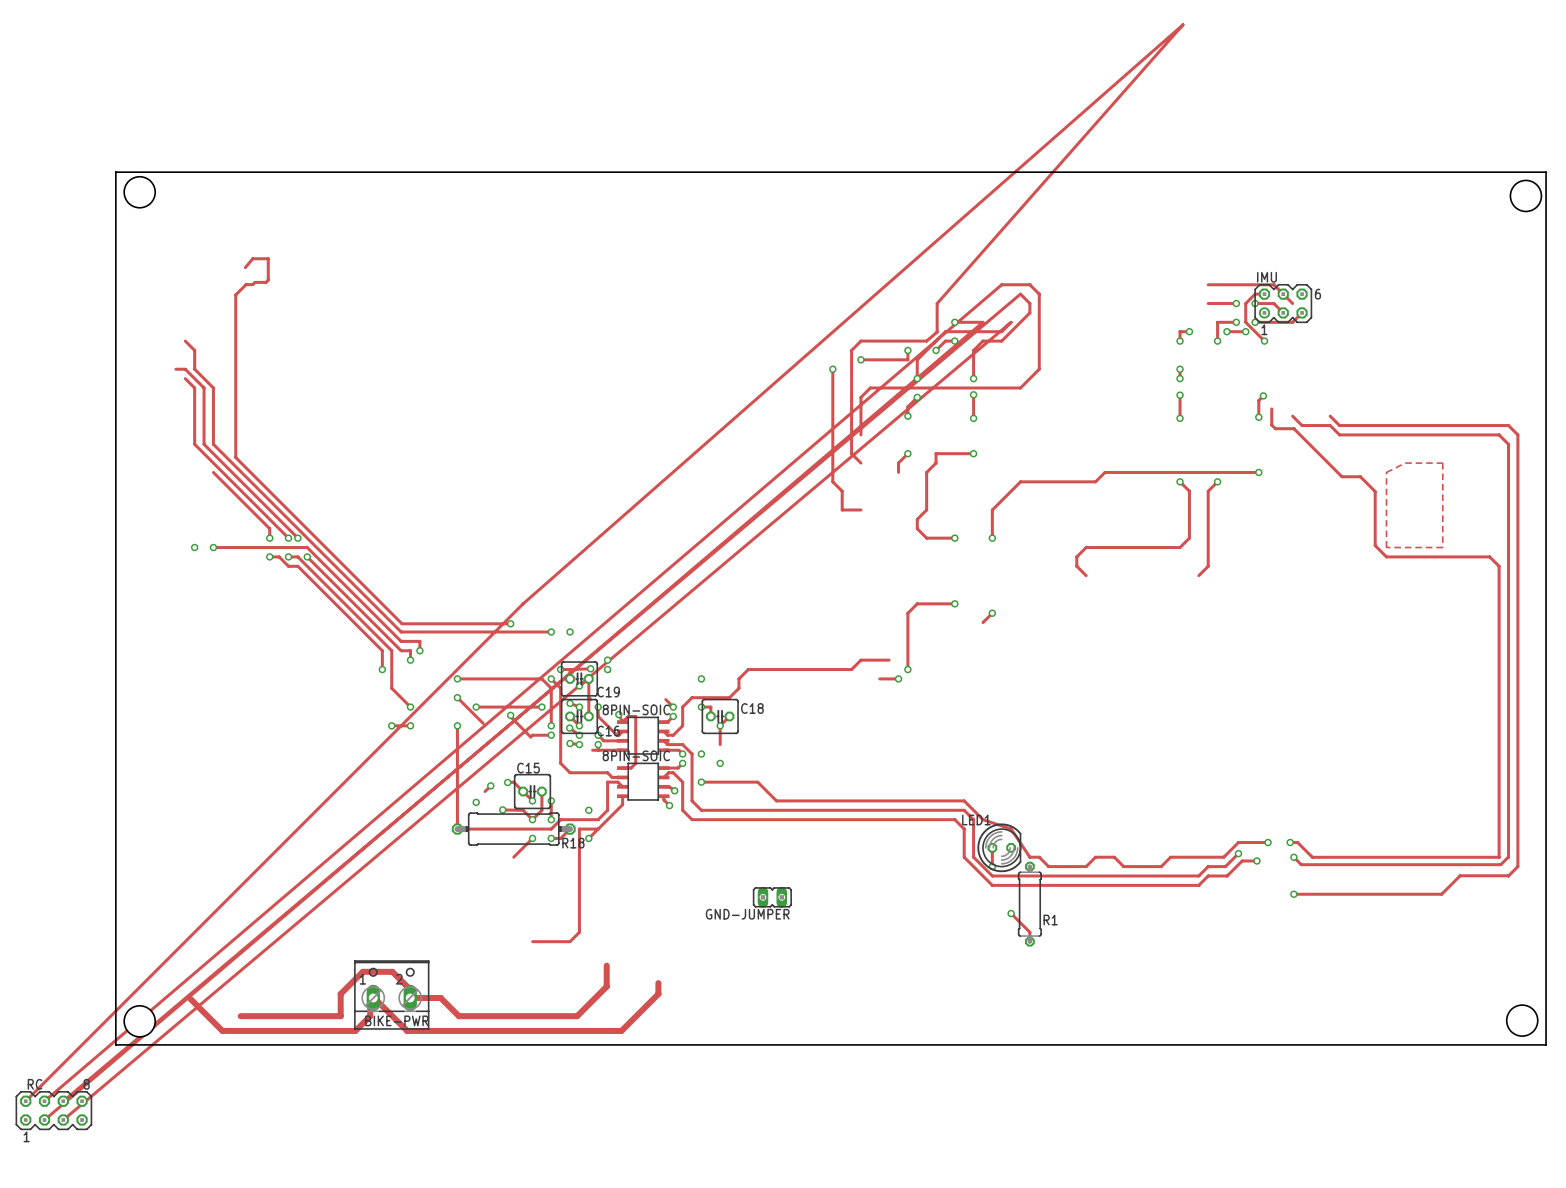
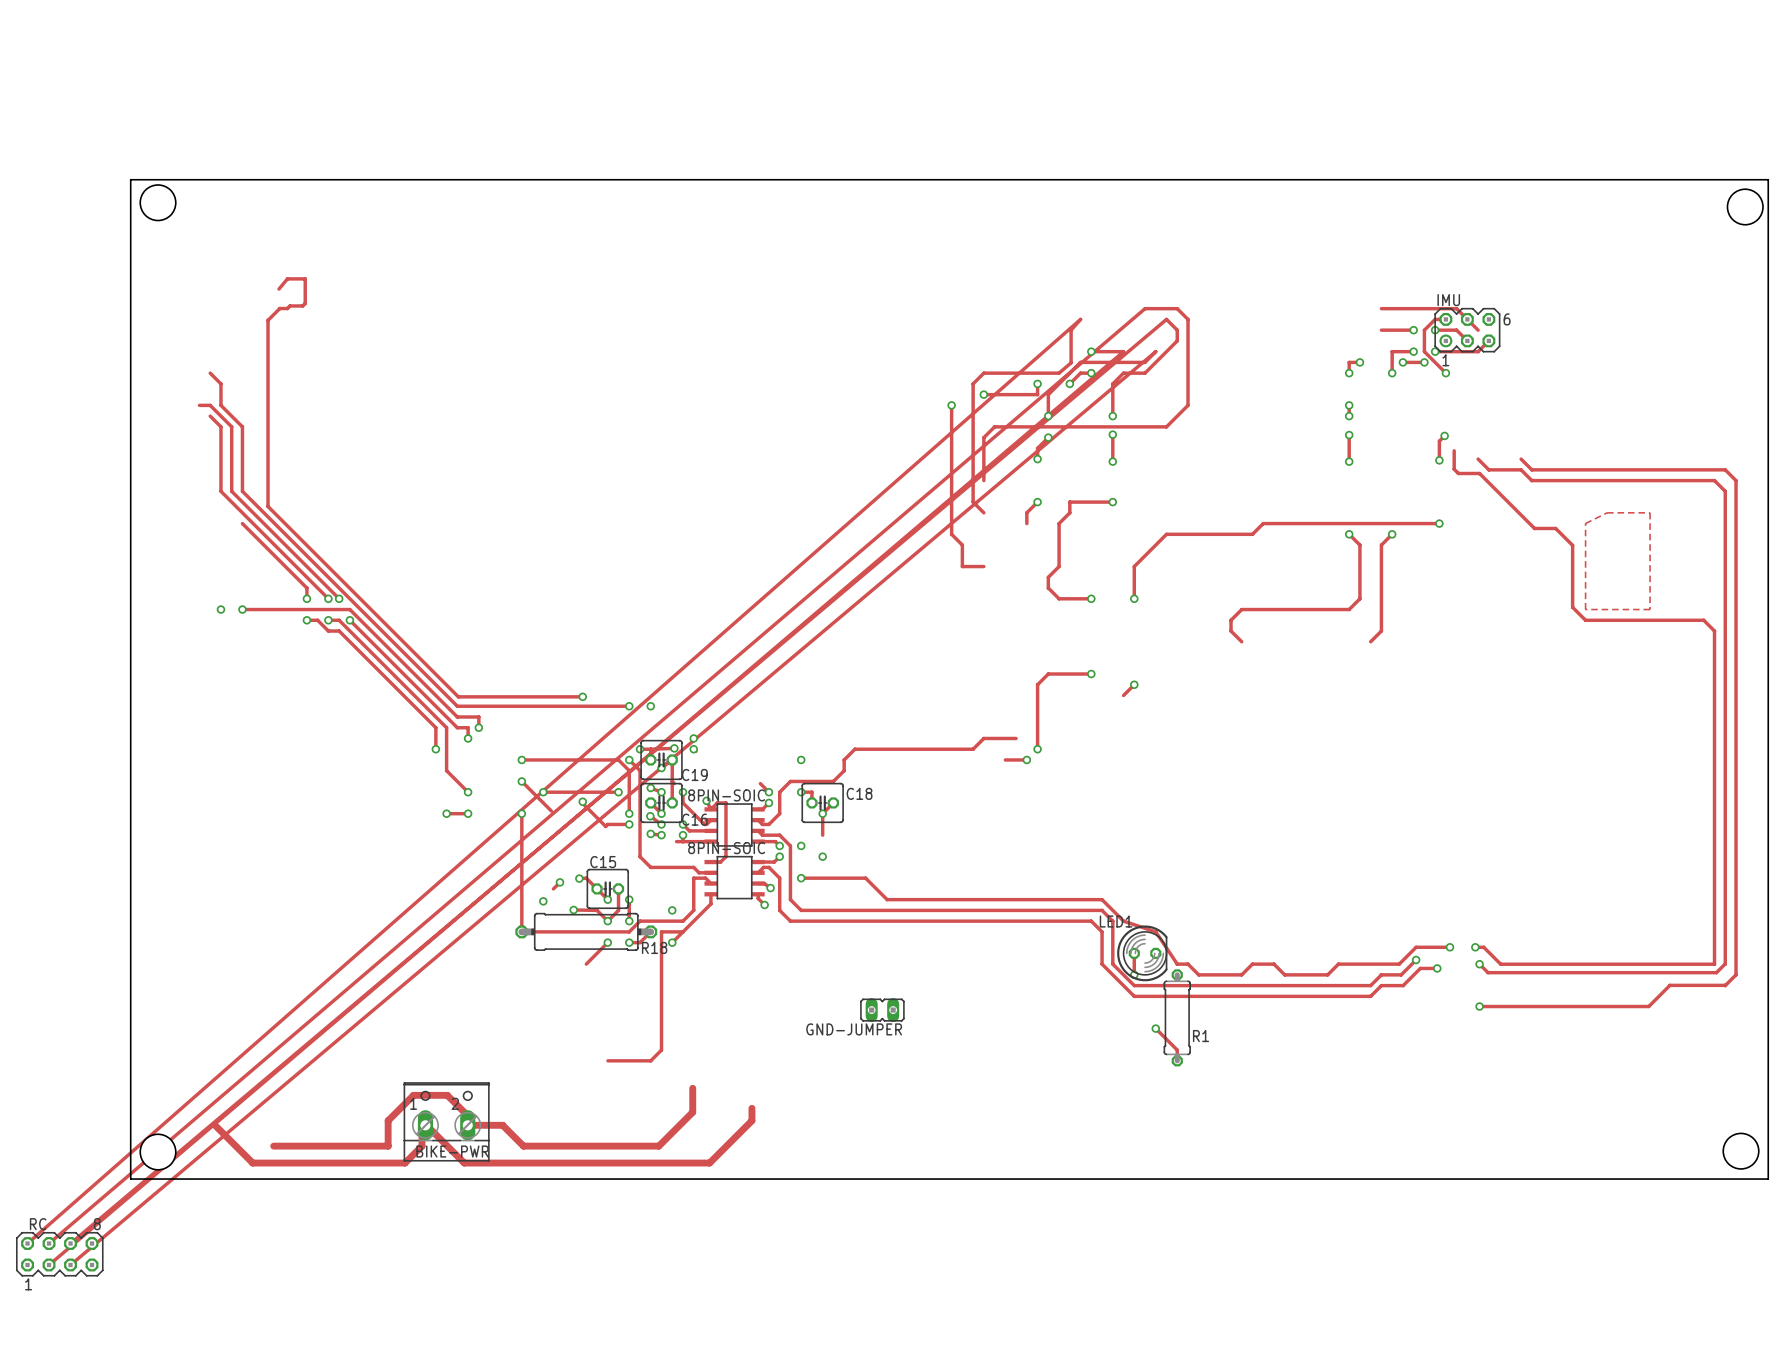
track: (945, 294) (1182, 24) (523, 603) (25, 1101) -> (1080, 319) (27, 1243)

